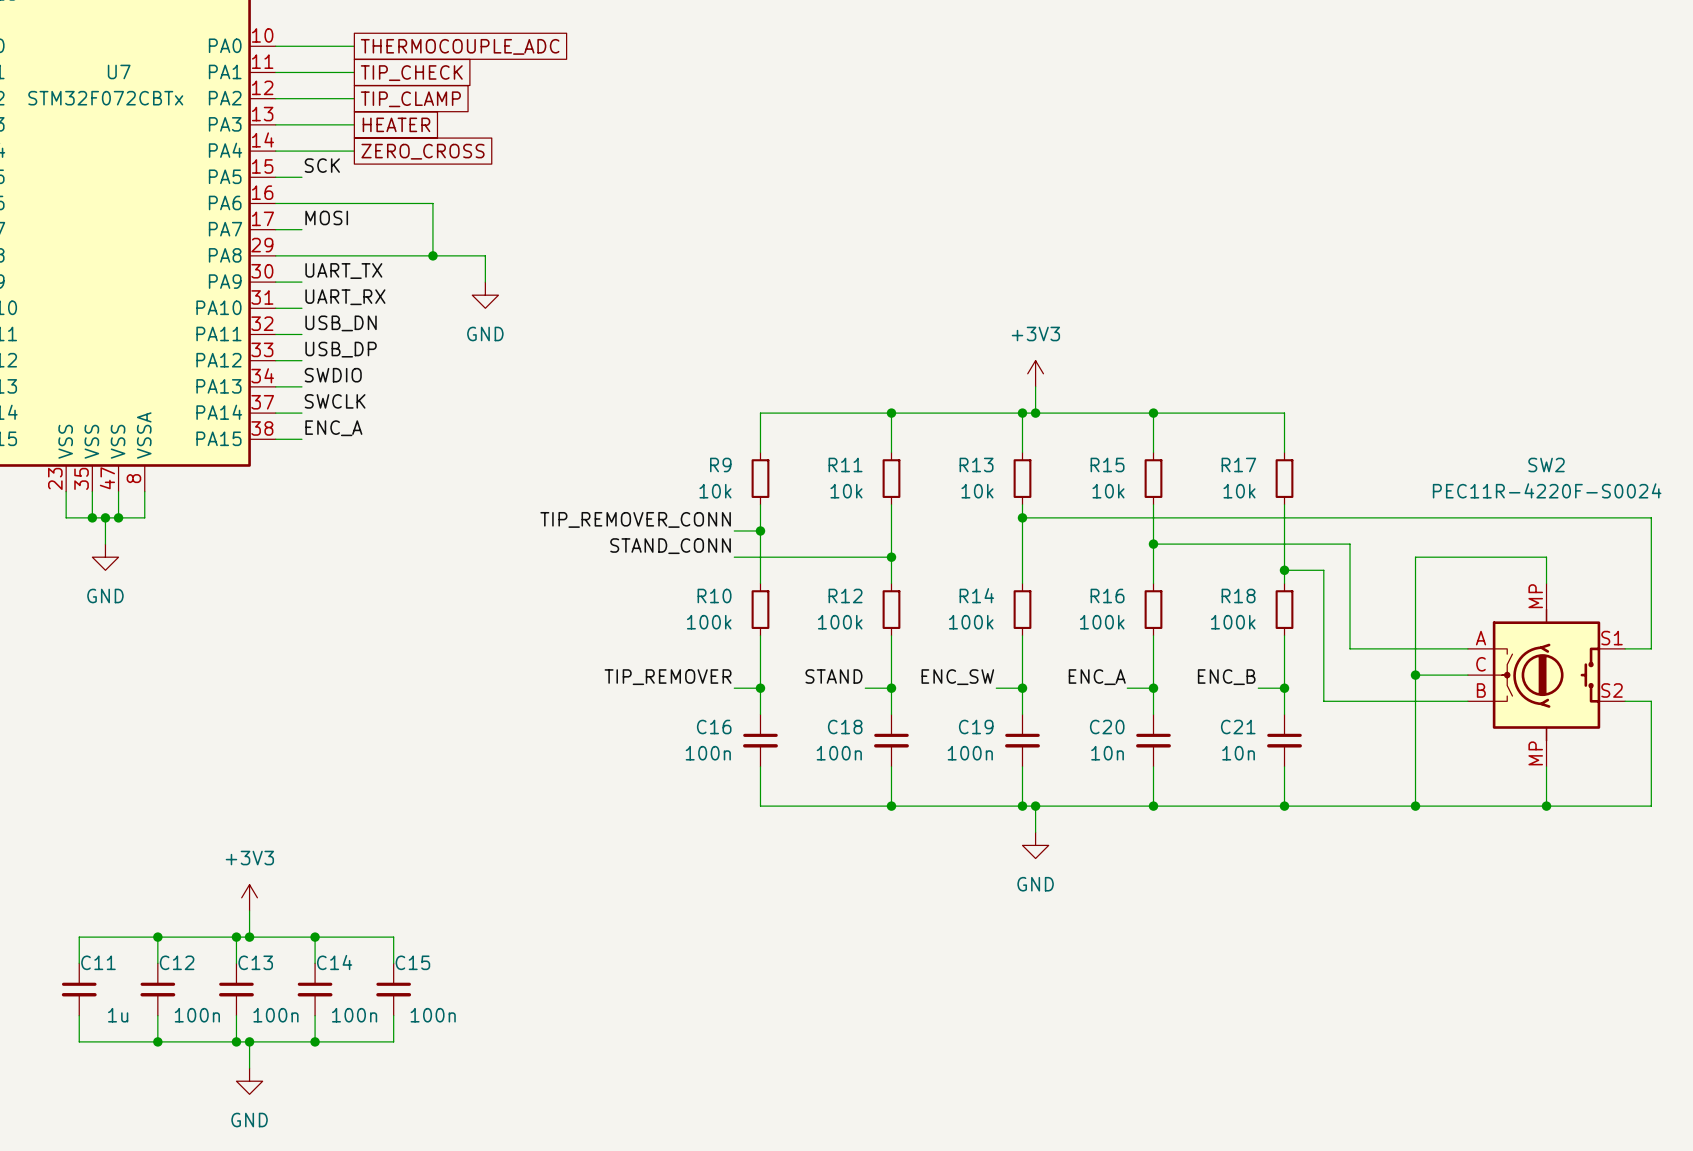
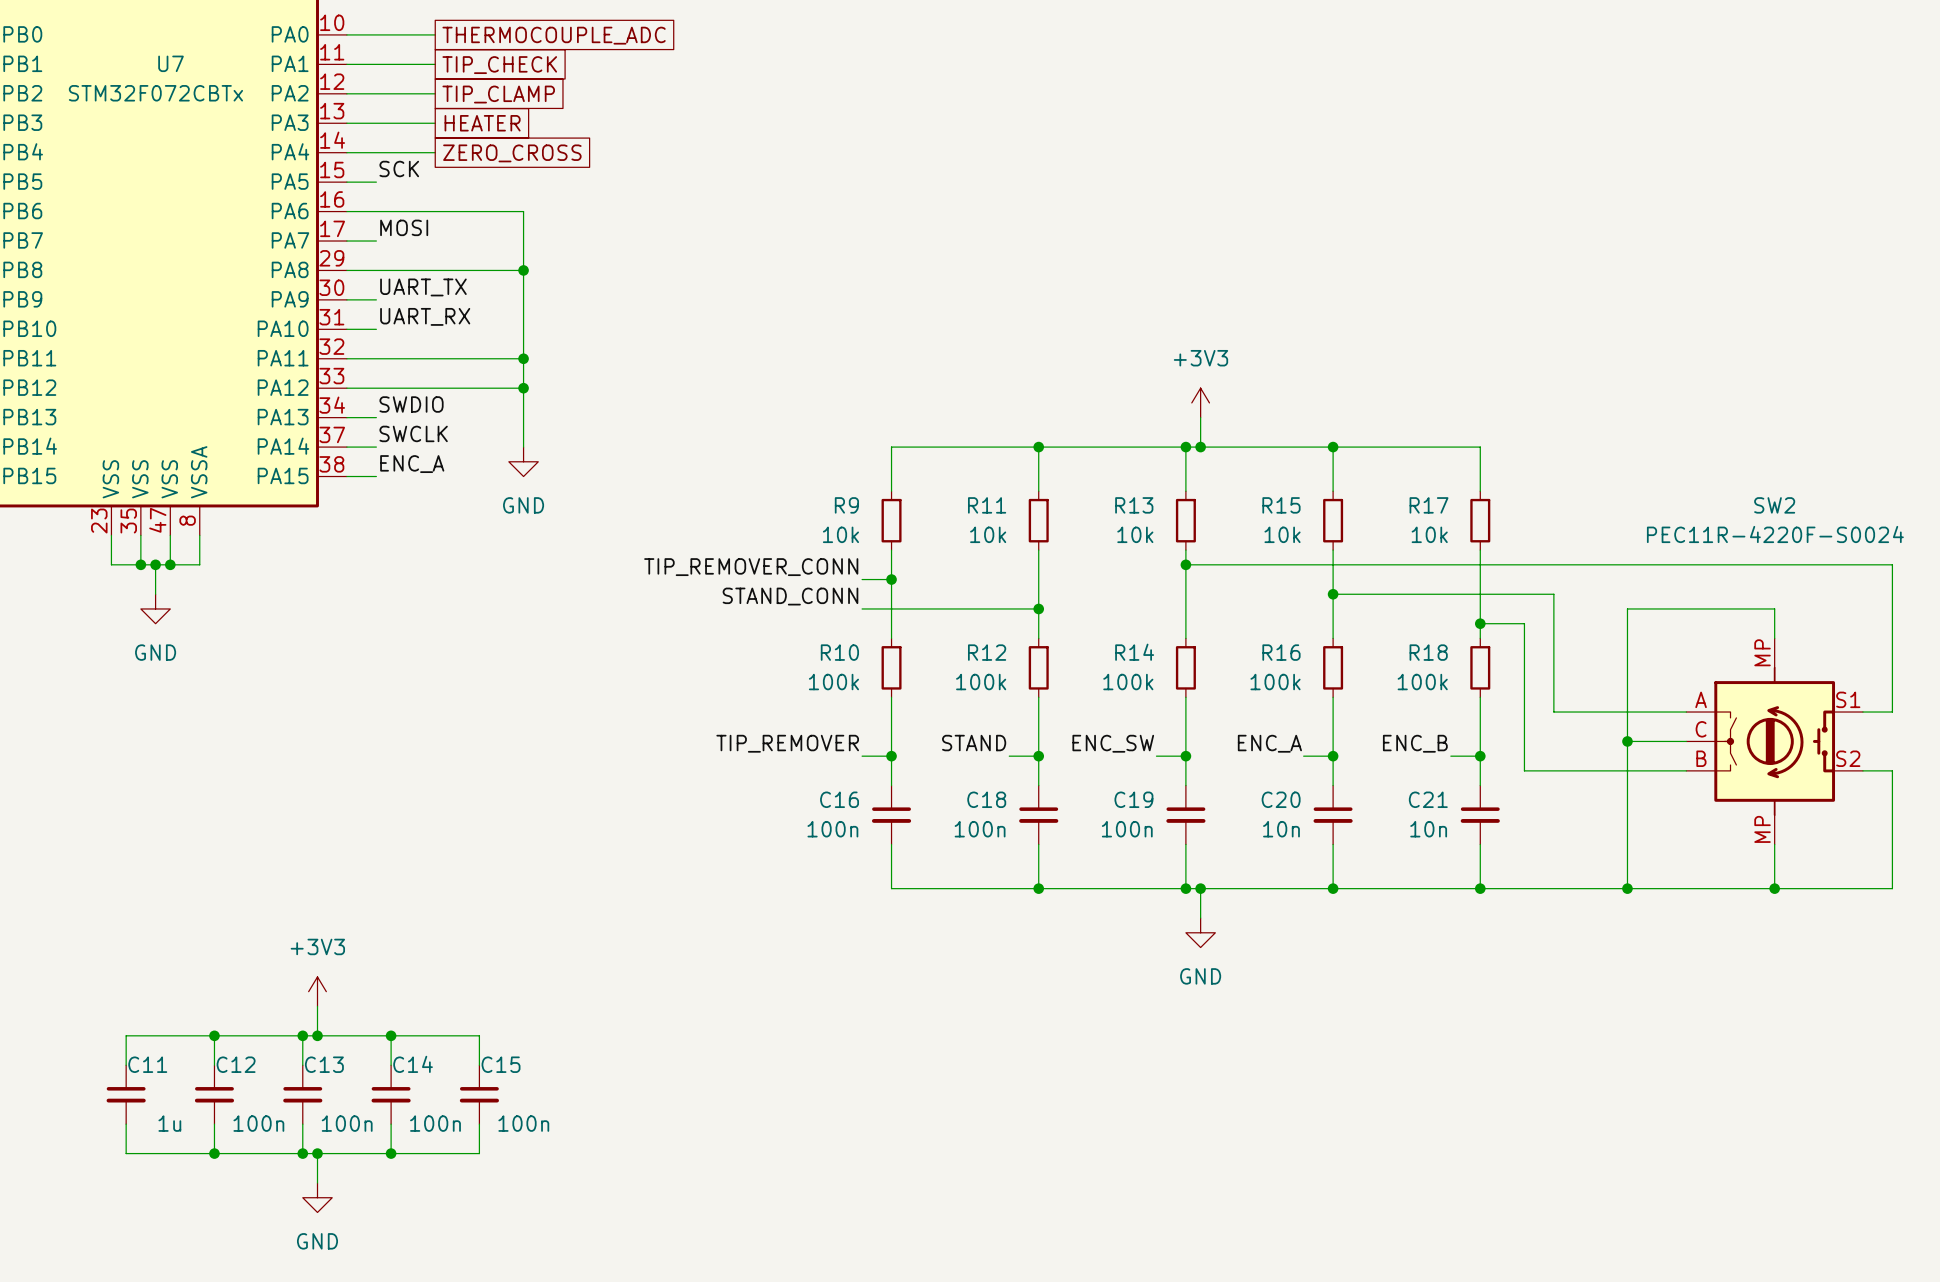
wire: (432, 255) (485, 255) (485, 282) -> (523, 270) (523, 447)
power symbol position: GND (485, 295) -> GND (523, 461)
label: USB_DN (341, 323) -> none
wire: none -> (376, 358) (523, 358)
junction: none -> (523, 358)
label: USB_DP (341, 349) -> none
wire: none -> (376, 388) (523, 388)
junction: none -> (523, 388)
SW2 symbol: [1467, 583, 1626, 767] -> [1686, 638, 1863, 845]

